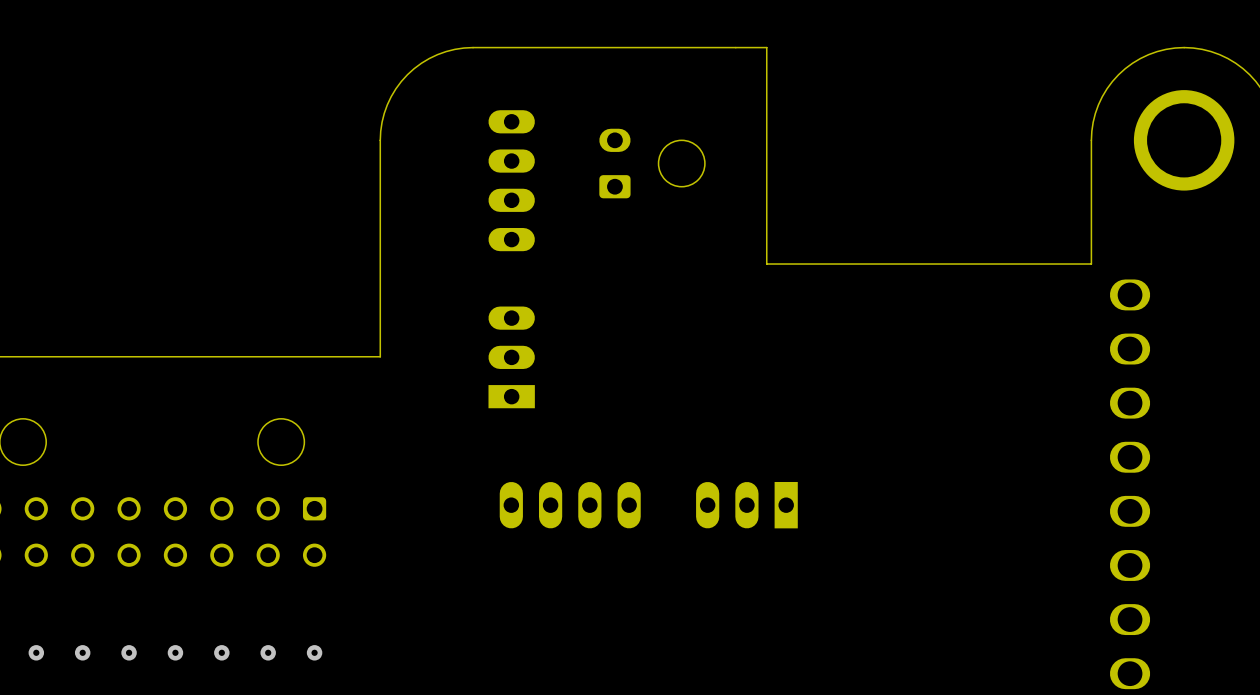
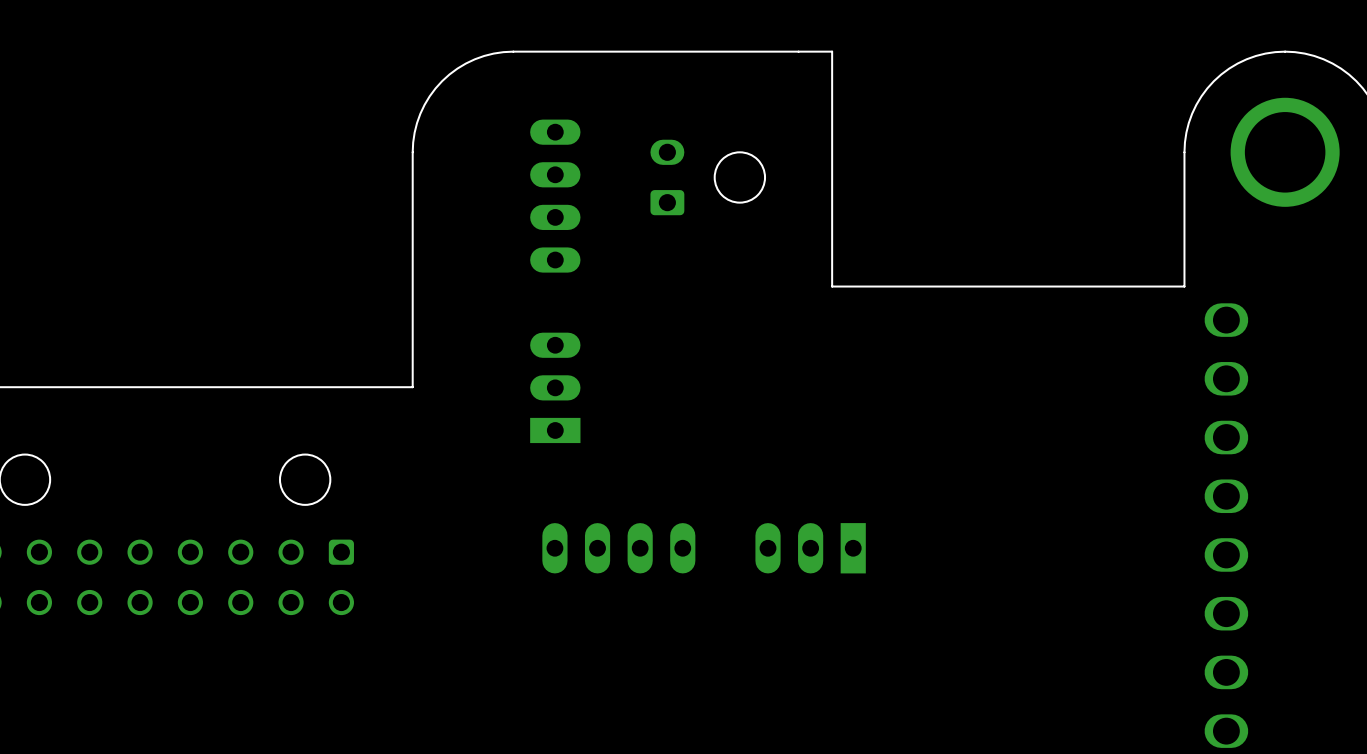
via: (36, 652) -> none
via: (82, 652) -> none
via: (129, 652) -> none
via: (175, 652) -> none
via: (221, 652) -> none
via: (268, 652) -> none
via: (314, 652) -> none

